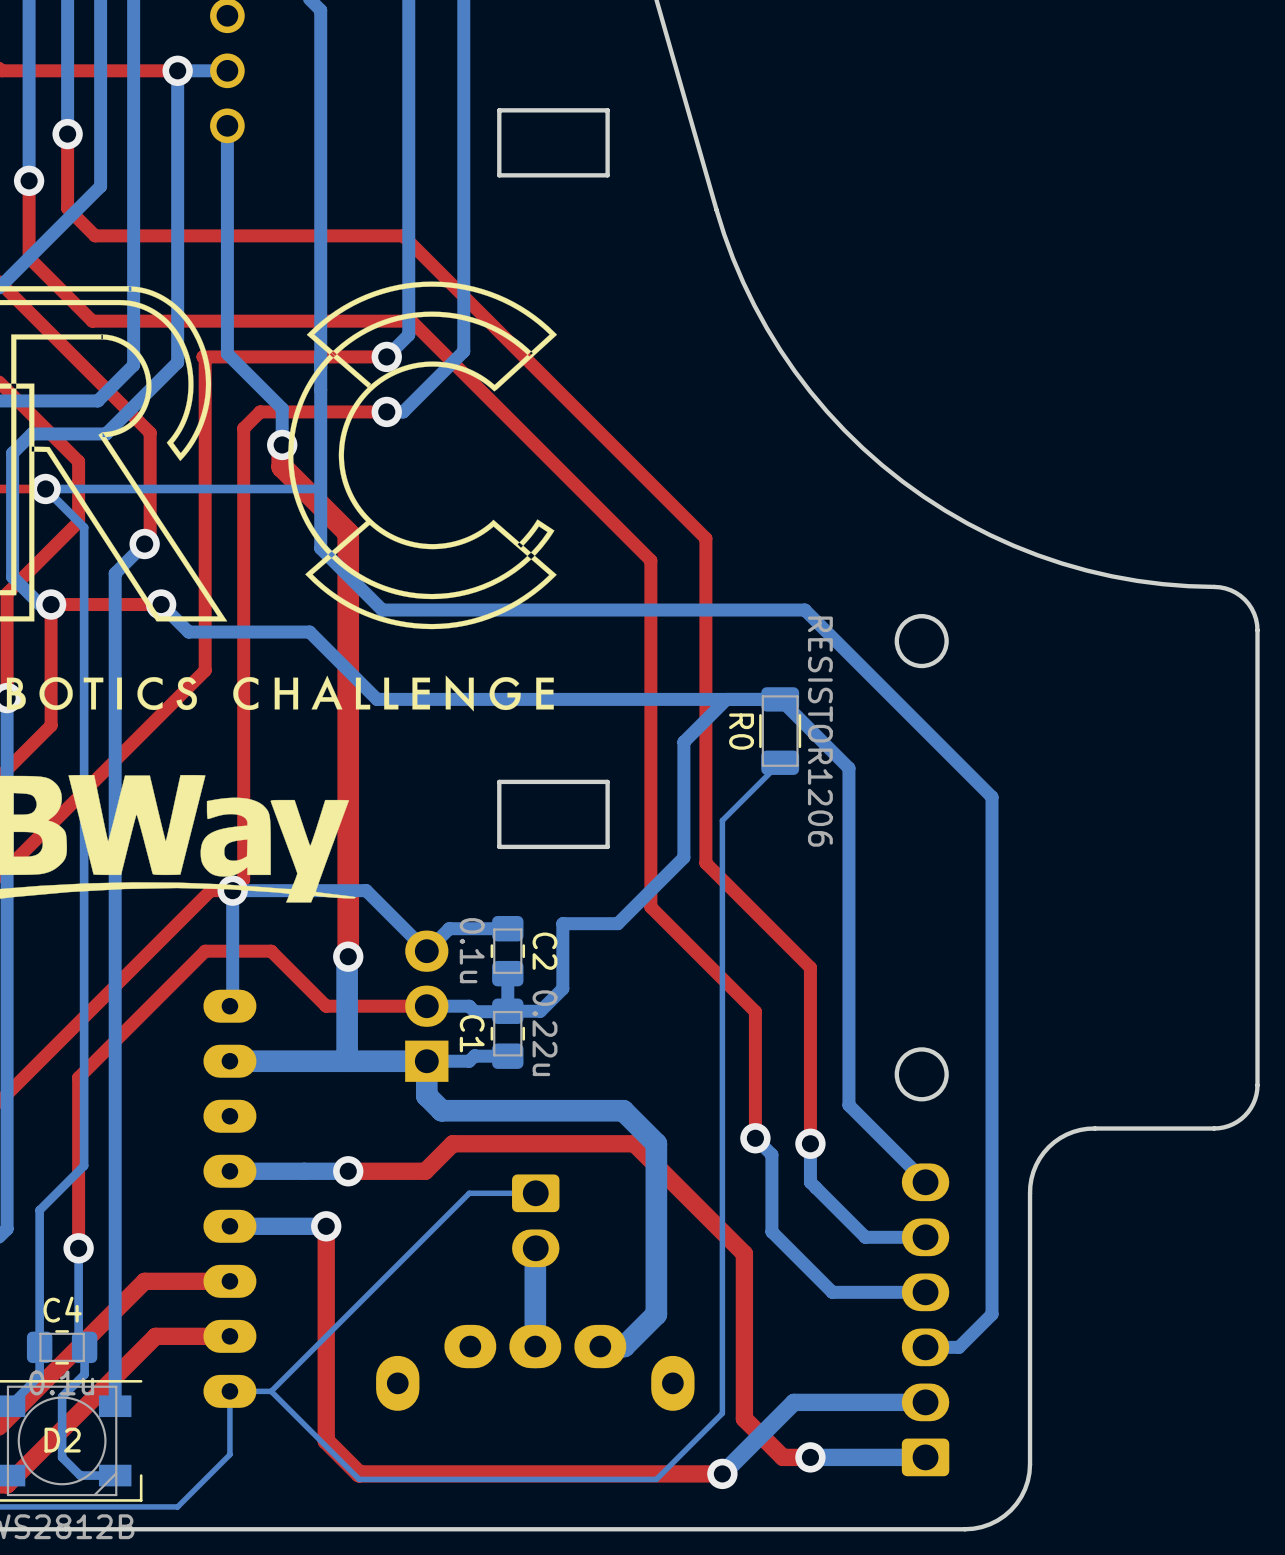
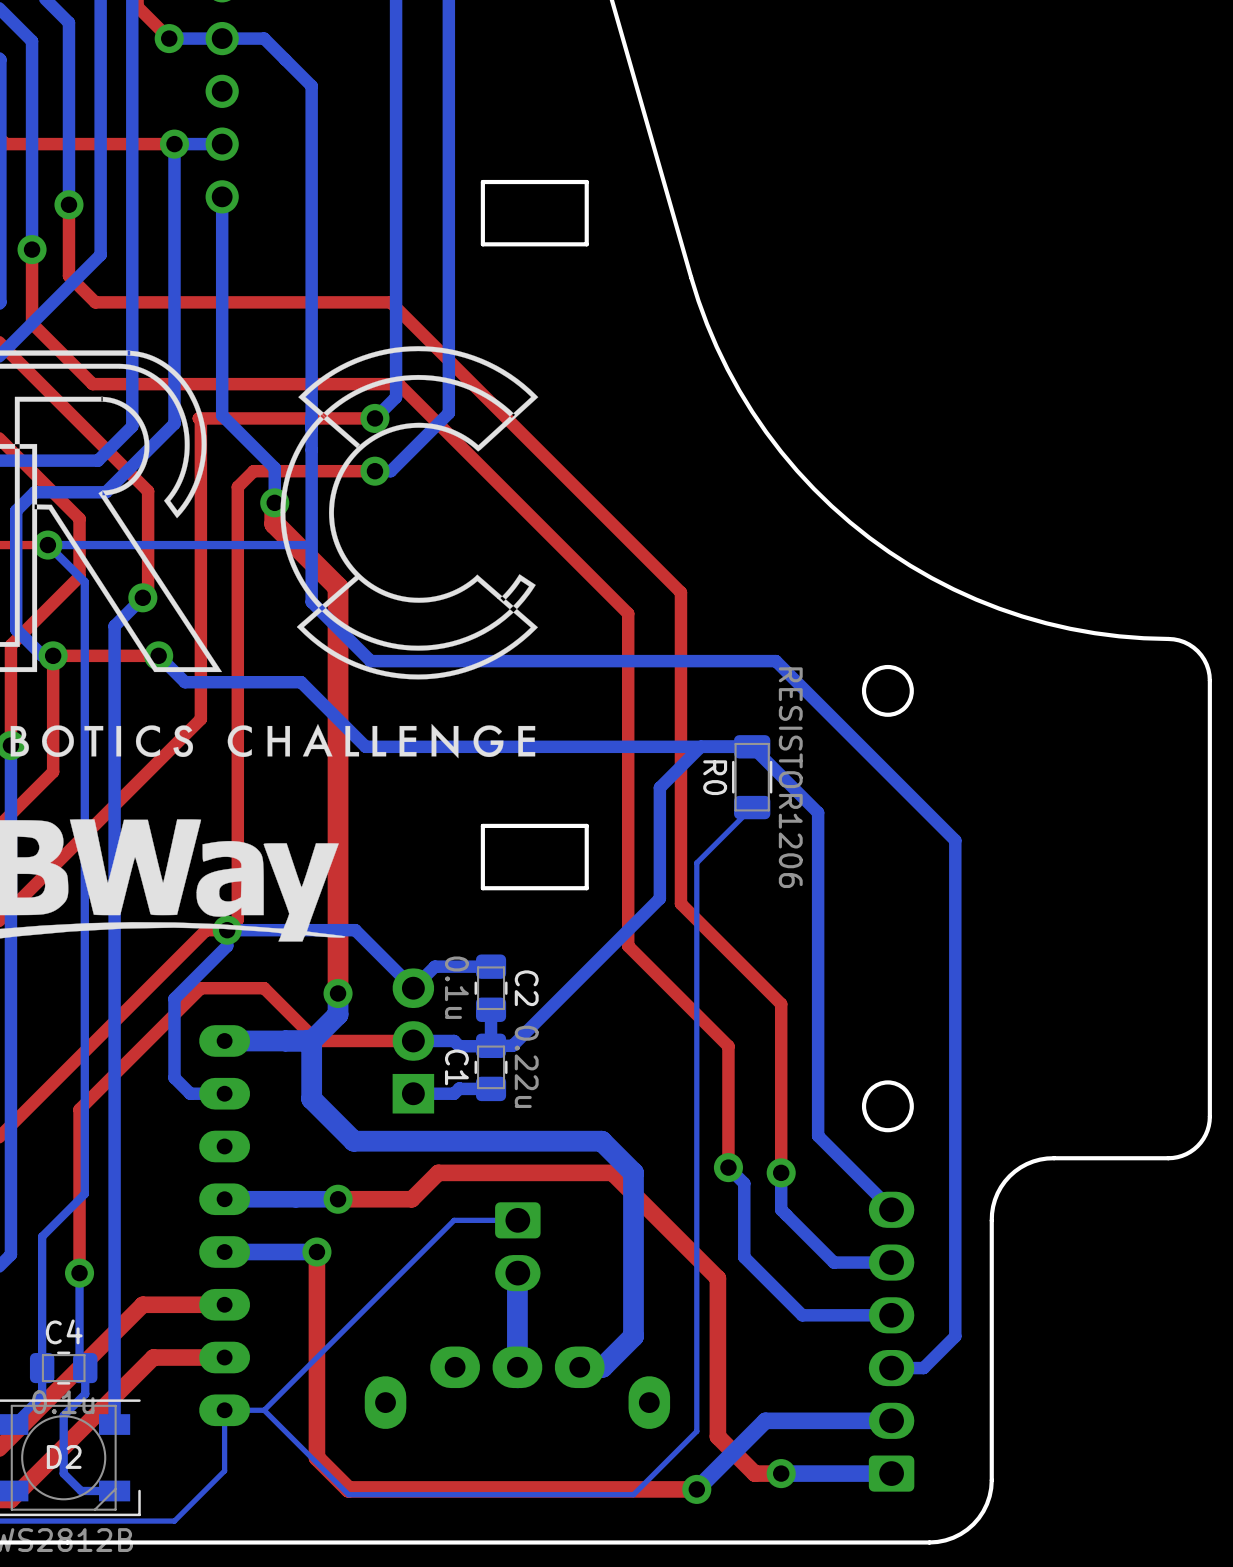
bottom track: (232, 907) (232, 1003) -> (227, 946) (174, 998) (174, 1077) (190, 1093) (224, 1093)
bottom track: (617, 923) (562, 923) (562, 988) (540, 1011) (530, 1011) -> (596, 961) (512, 1045)
bottom track: (348, 956) (347, 1061) -> (338, 993) (338, 1014) (311, 1040) (224, 1040)
bottom track: (229, 1061) (426, 1061) (426, 1095) (441, 1110) -> (306, 1040) (311, 1046) (311, 1099) (353, 1141) (427, 1141)

